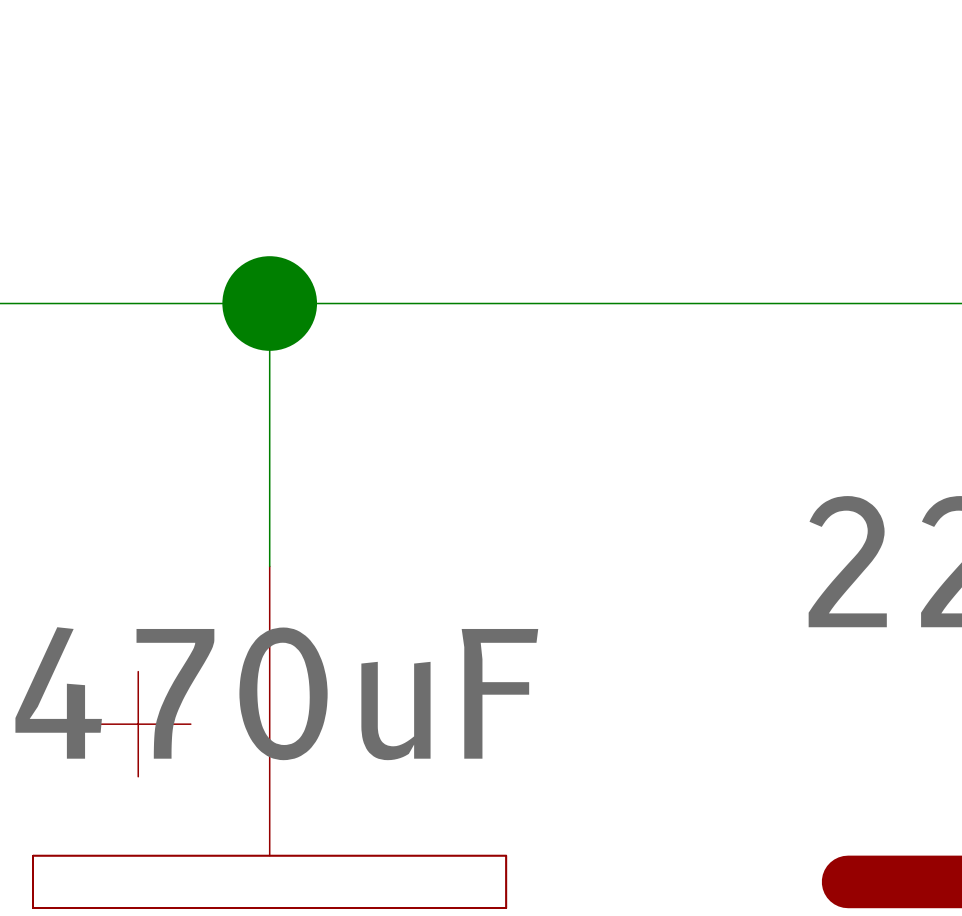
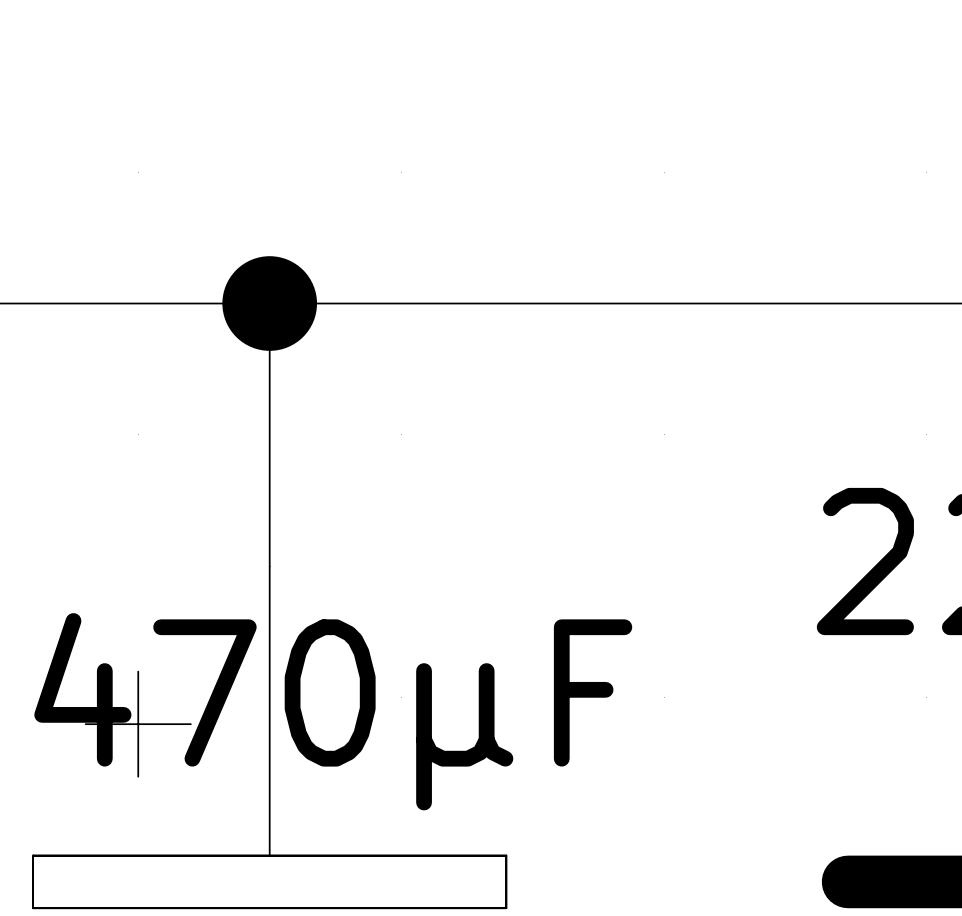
part value: 470uF (276, 693) -> 470µF (333, 711)

